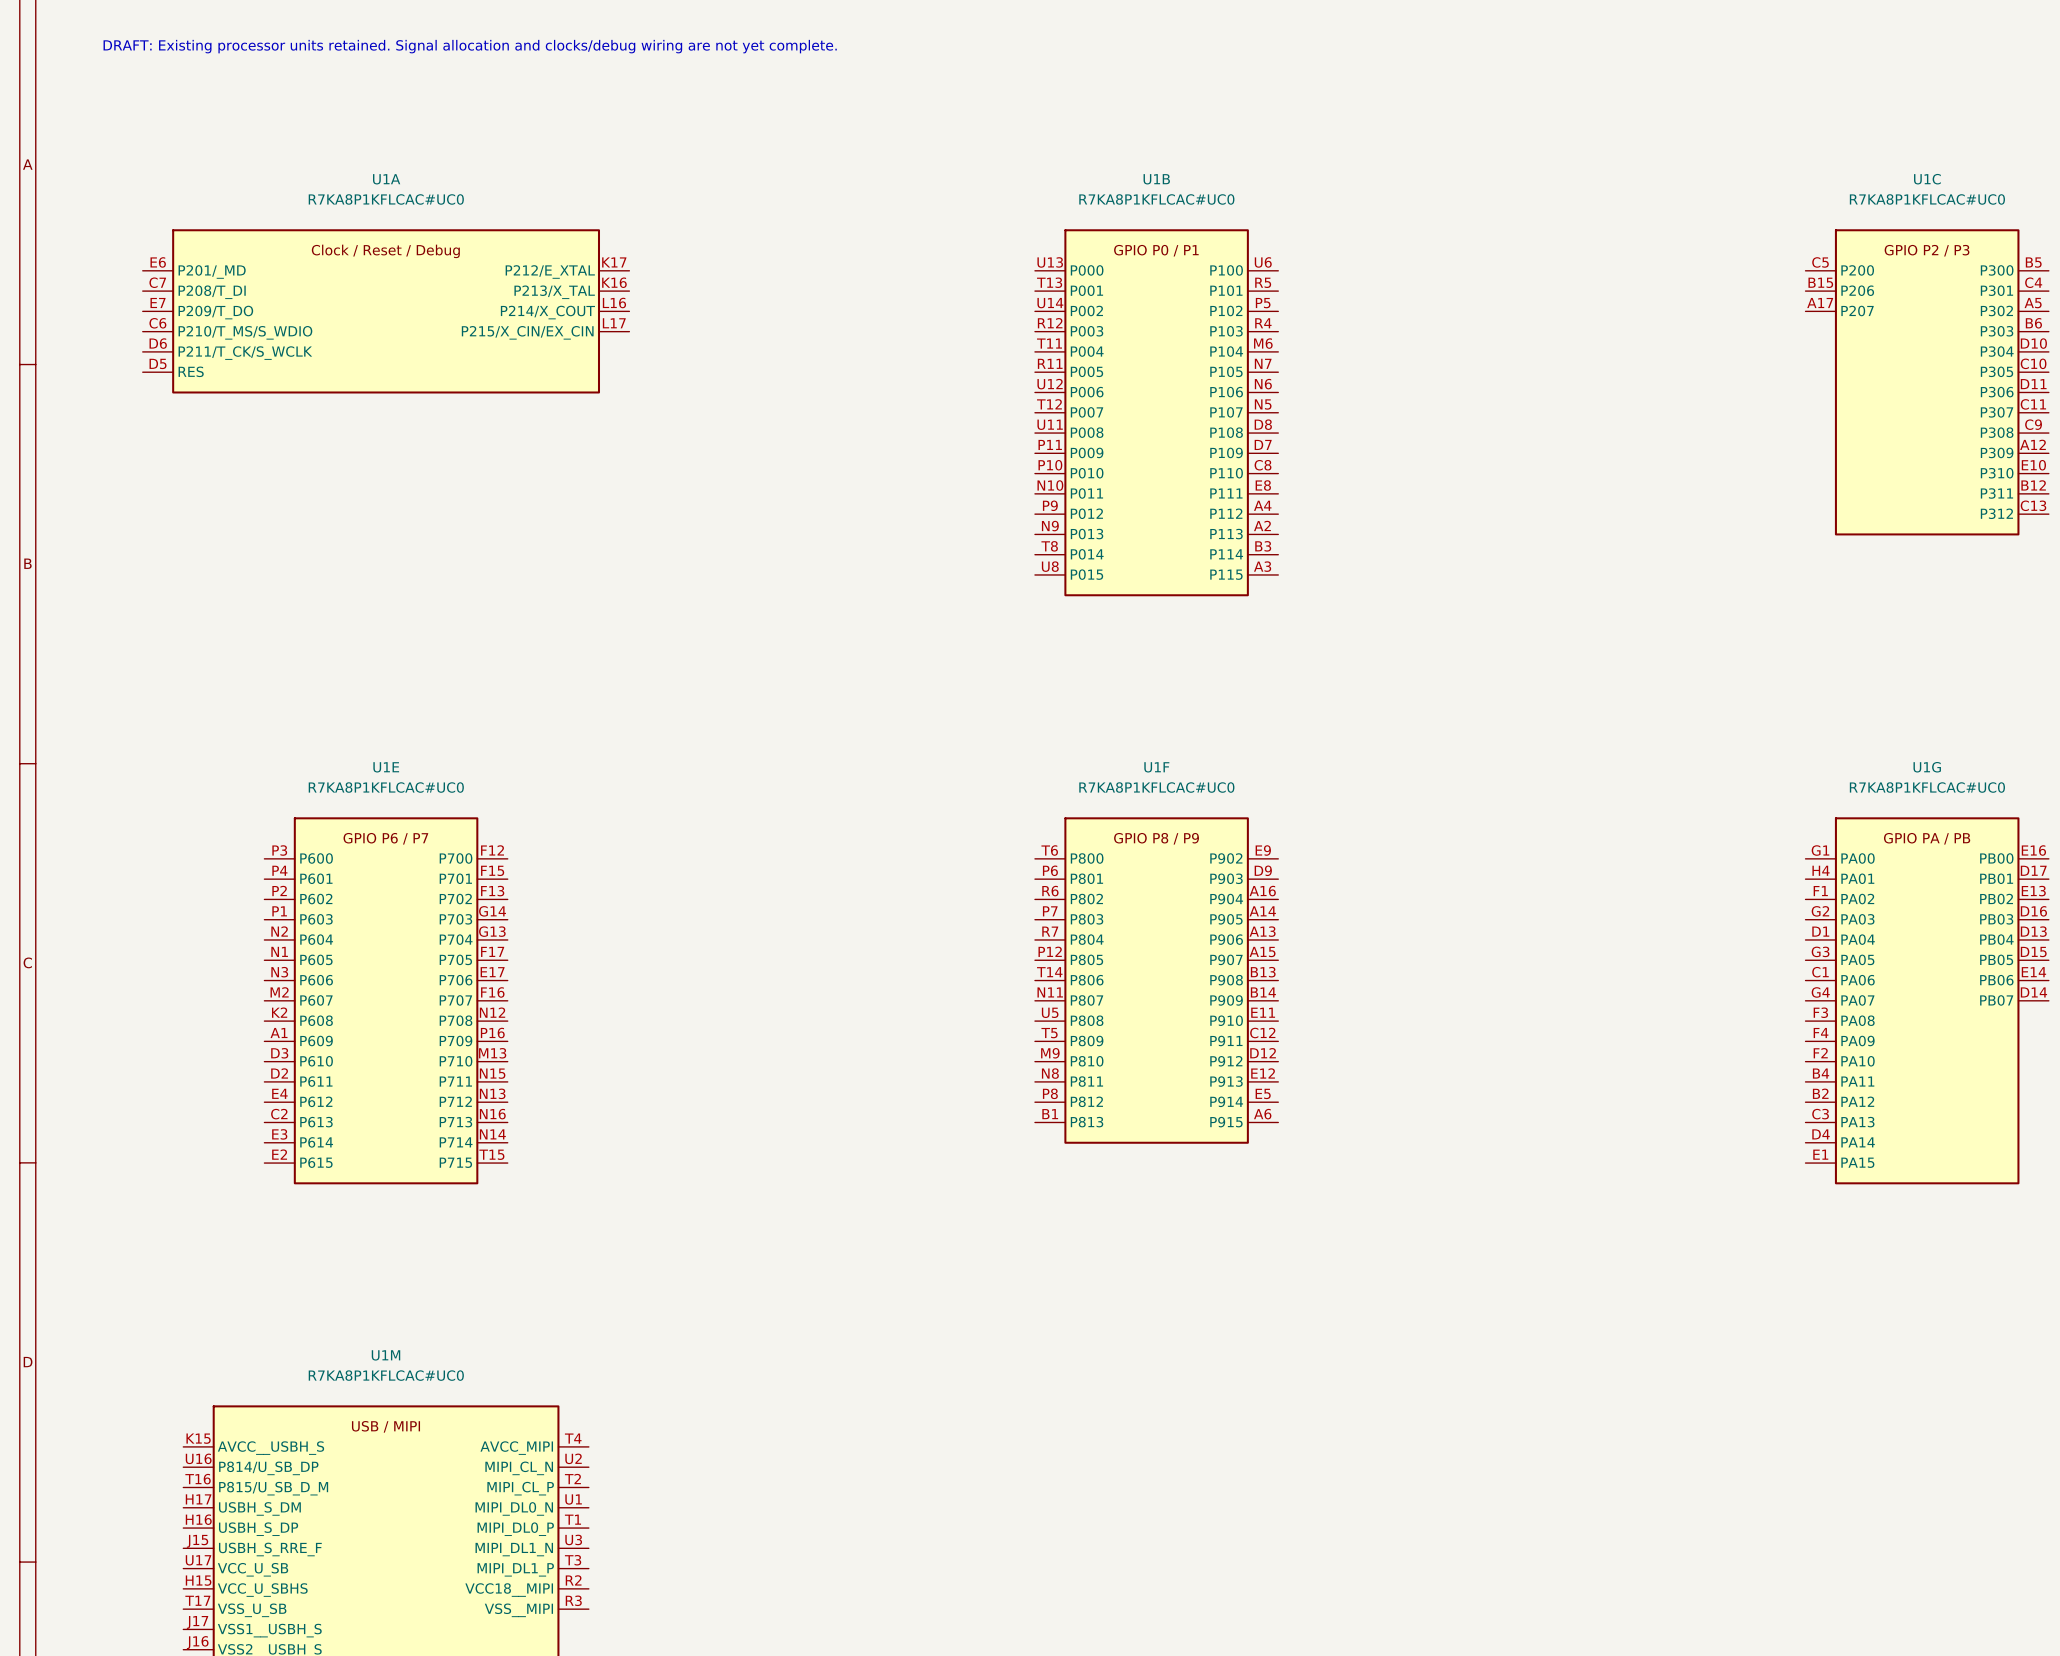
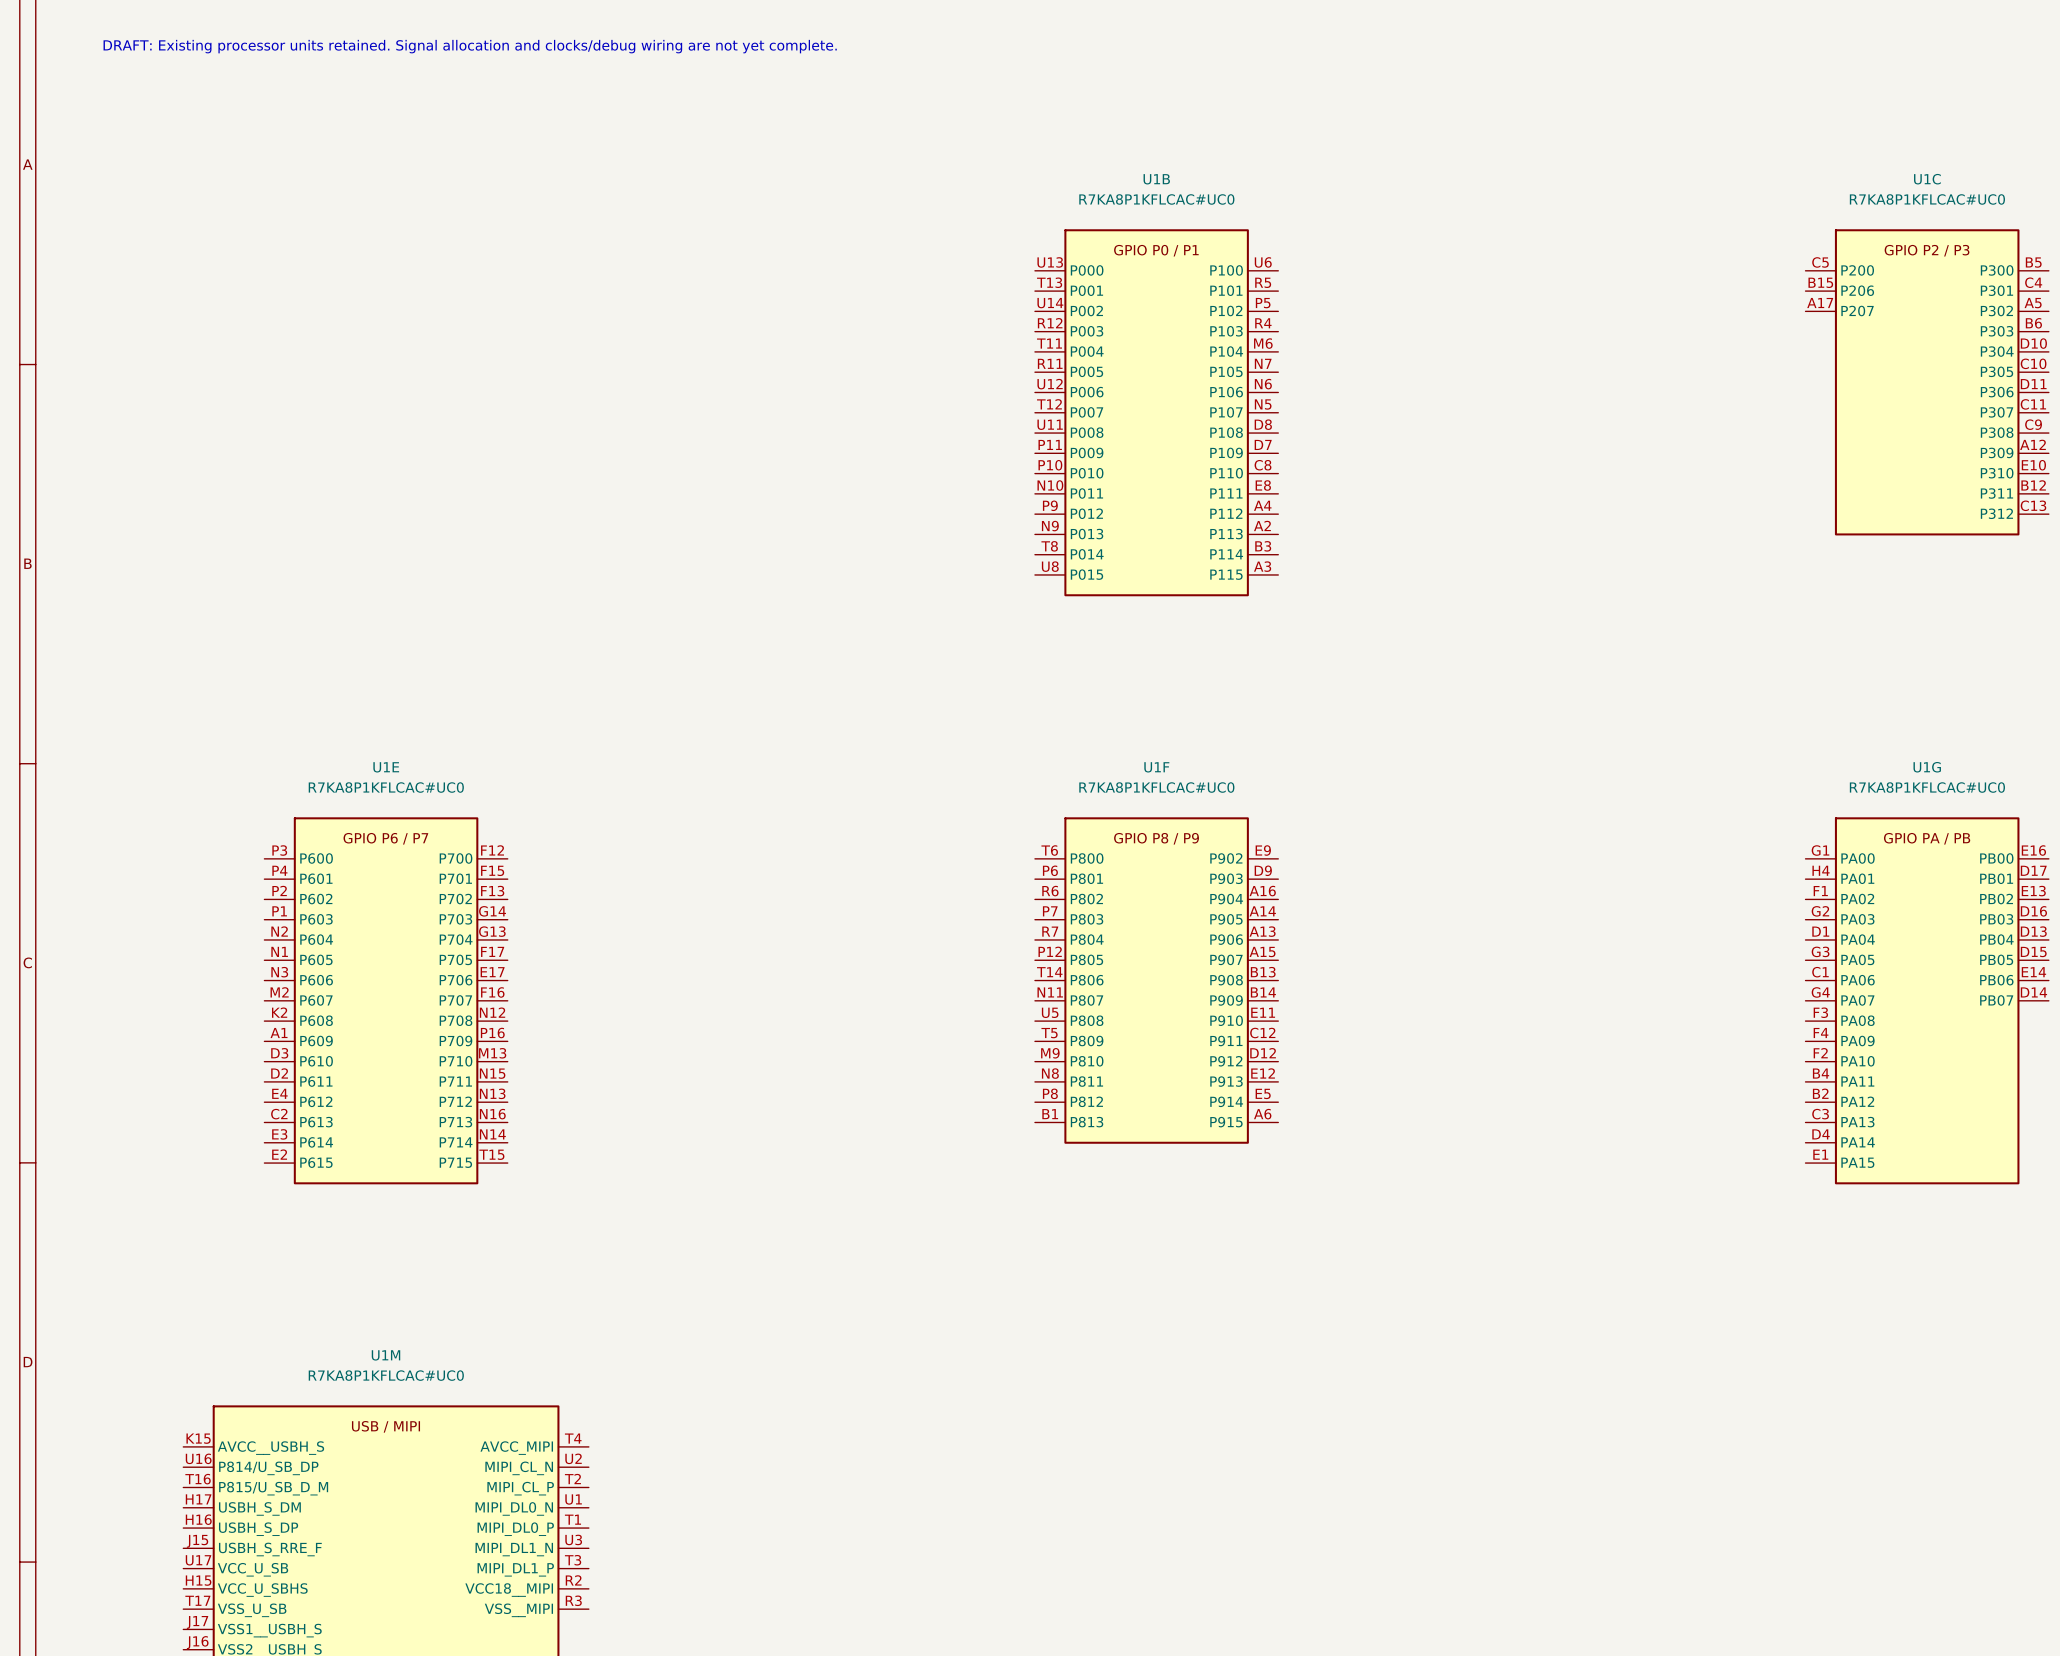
U1A: R7KA8P1KFLCAC#UC0 (386, 311) -> none

